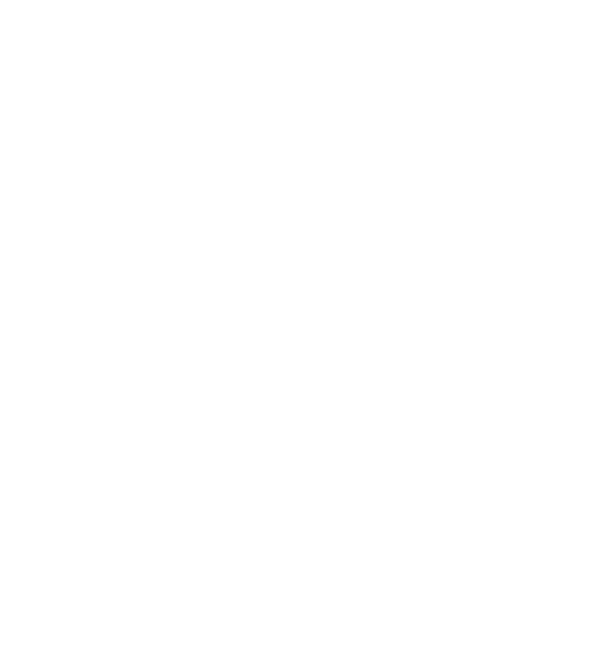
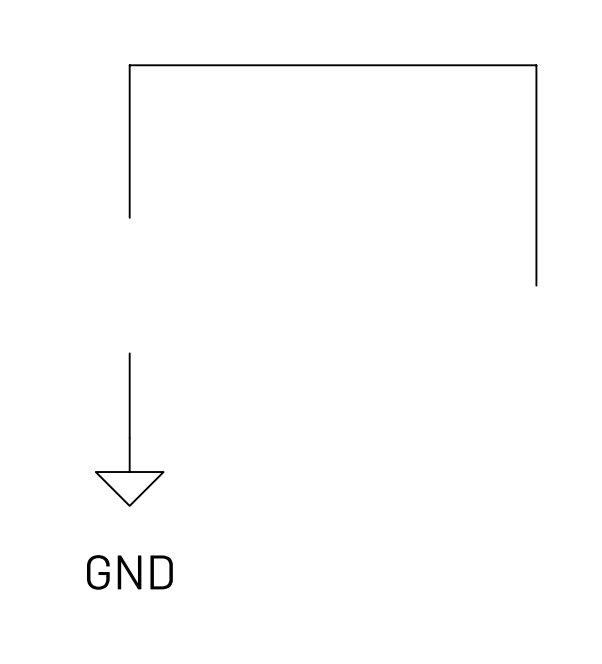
wire: none -> (129, 217) (129, 65) (536, 65) (536, 285)
wire: none -> (129, 353) (129, 438)
power symbol: none -> GND (129, 472)

